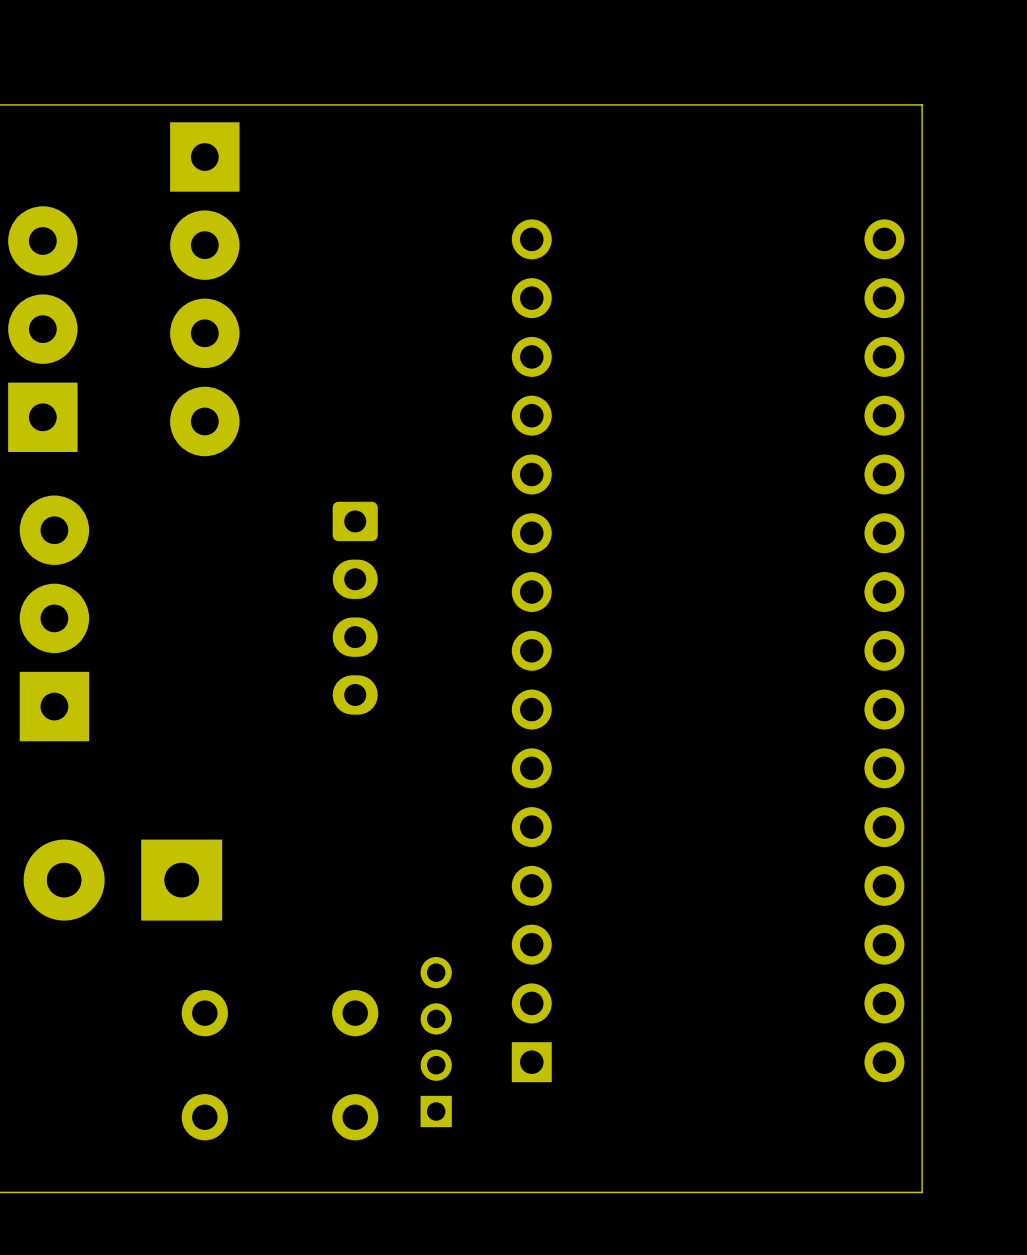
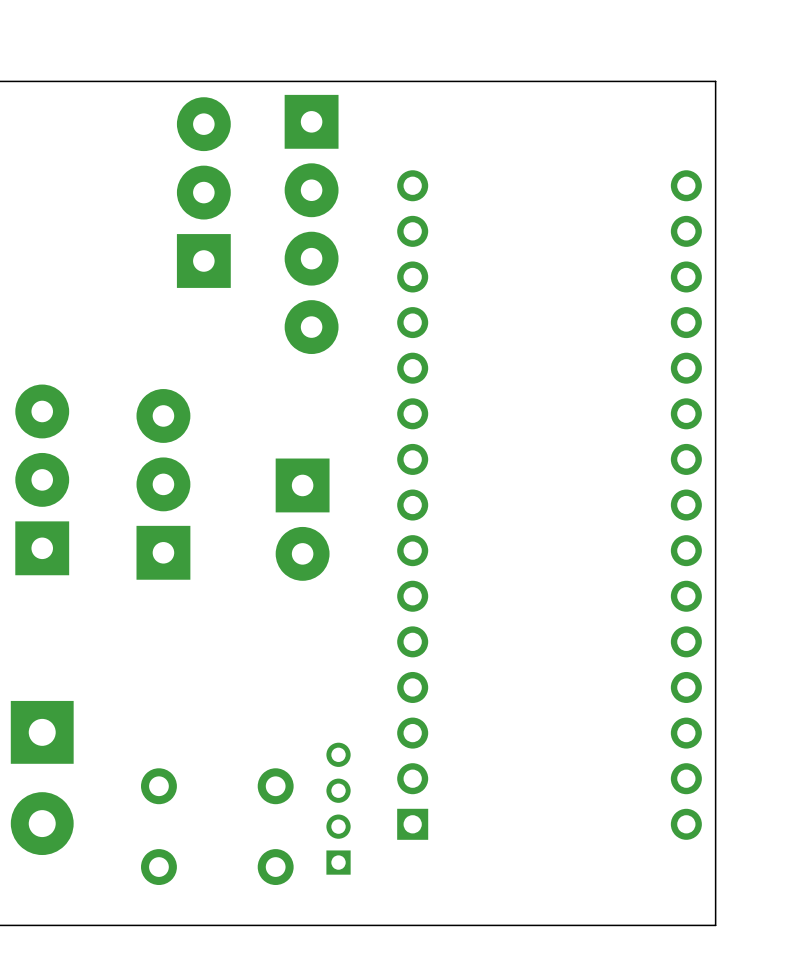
part: none -> (203, 192)
part position: (204, 289) -> (311, 224)
part: (42, 329) -> none
part: (355, 608) -> none
part: none -> (163, 484)
part: none -> (302, 519)
part rotation: 0° (122, 880) -> 90° counterclockwise (42, 777)
part position: (122, 880) -> (42, 777)

